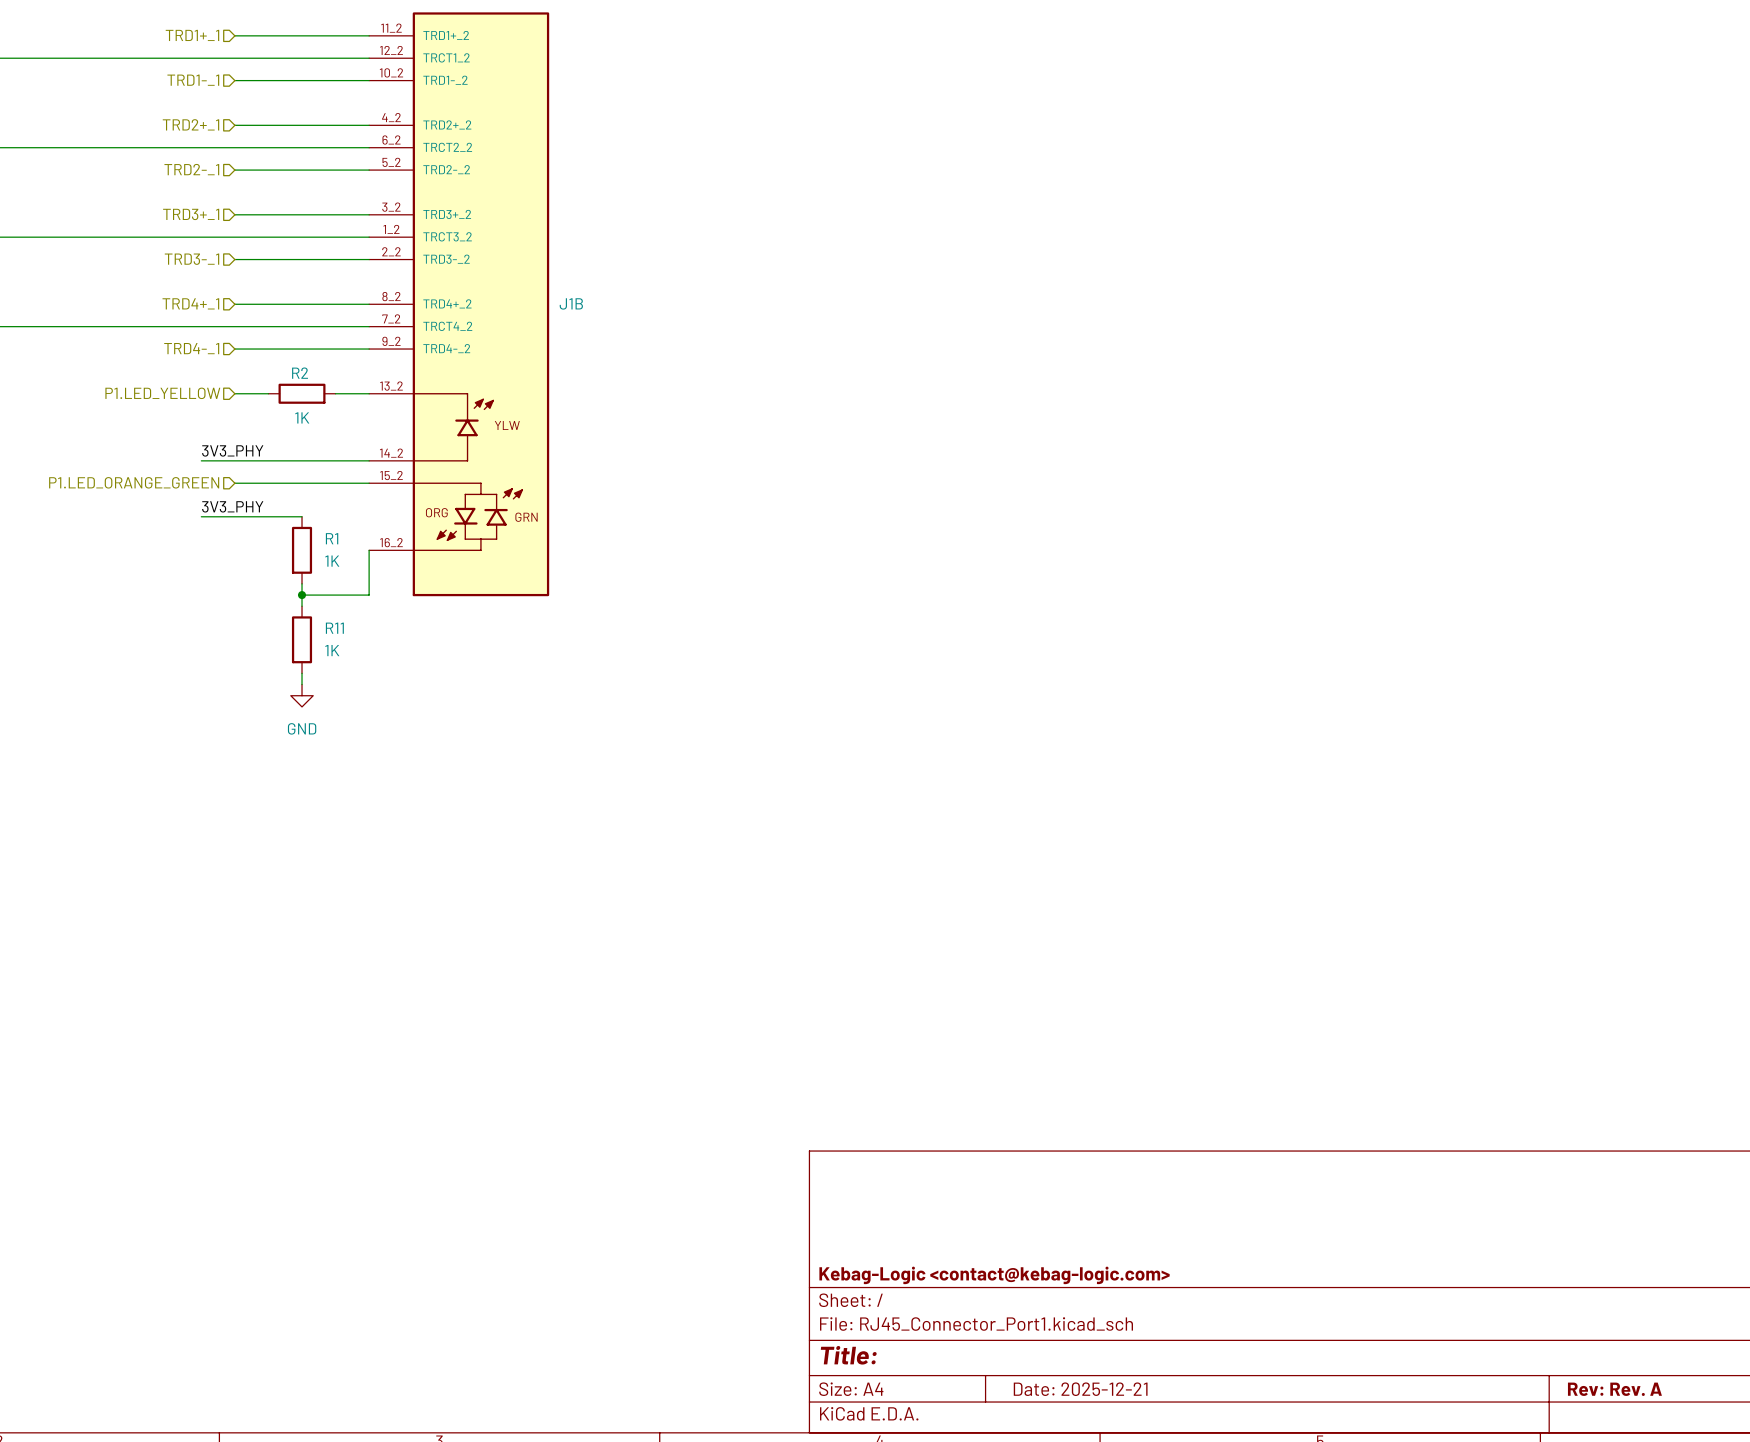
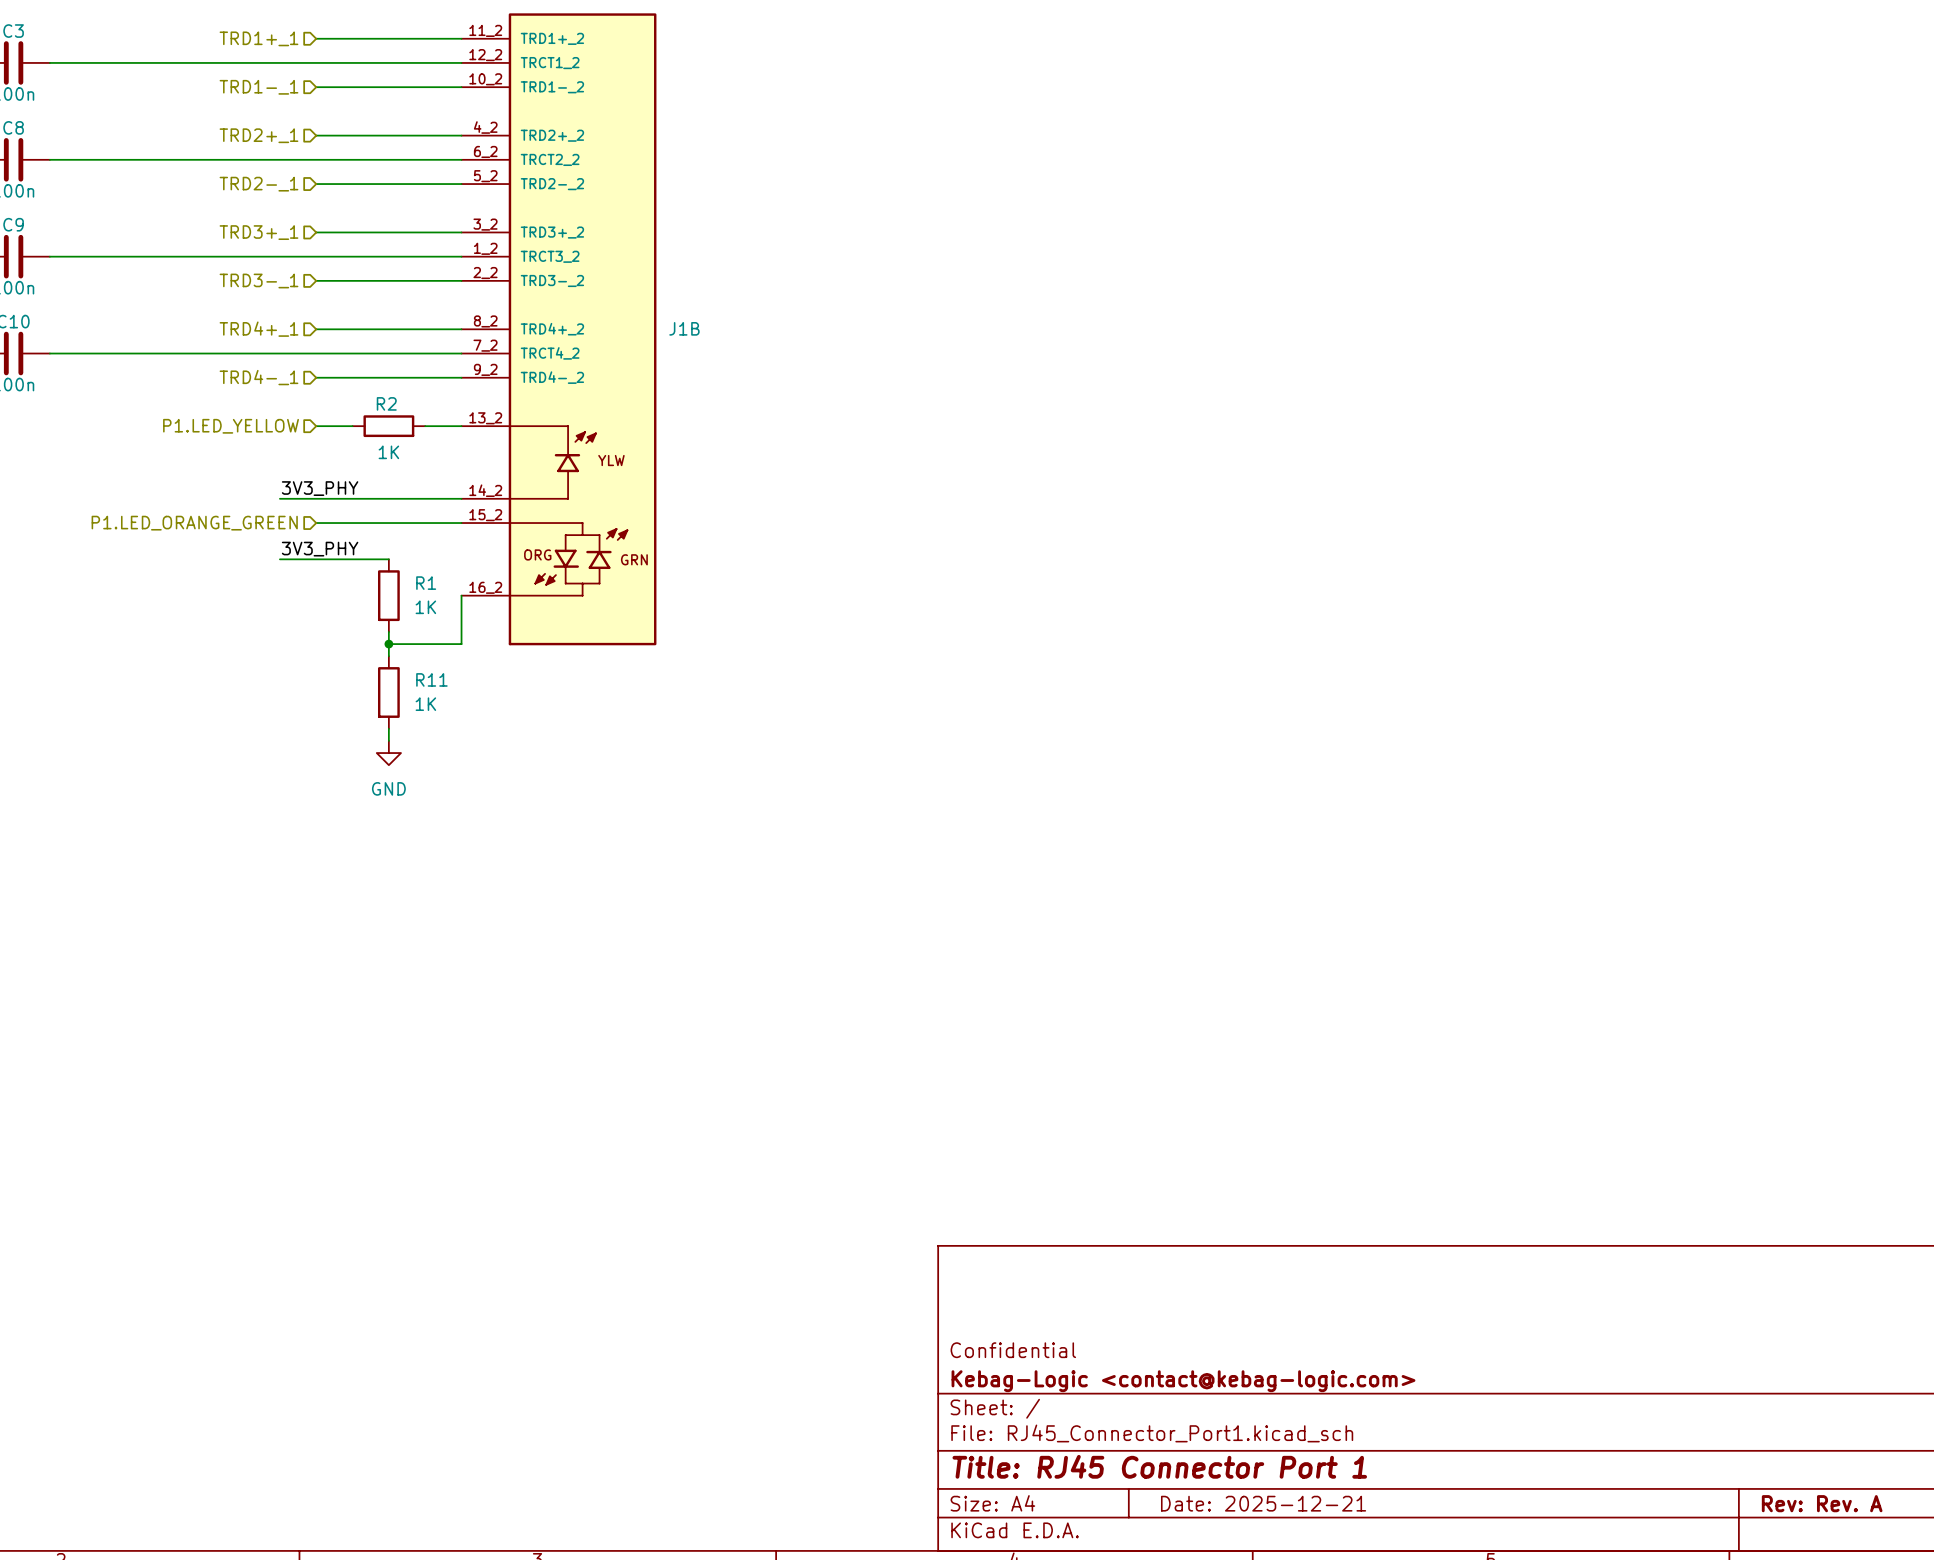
title block: none -> Confidential (1013, 1350)
title block: Title: (848, 1355) -> Title: RJ45 Connector Port 1 (1159, 1466)

